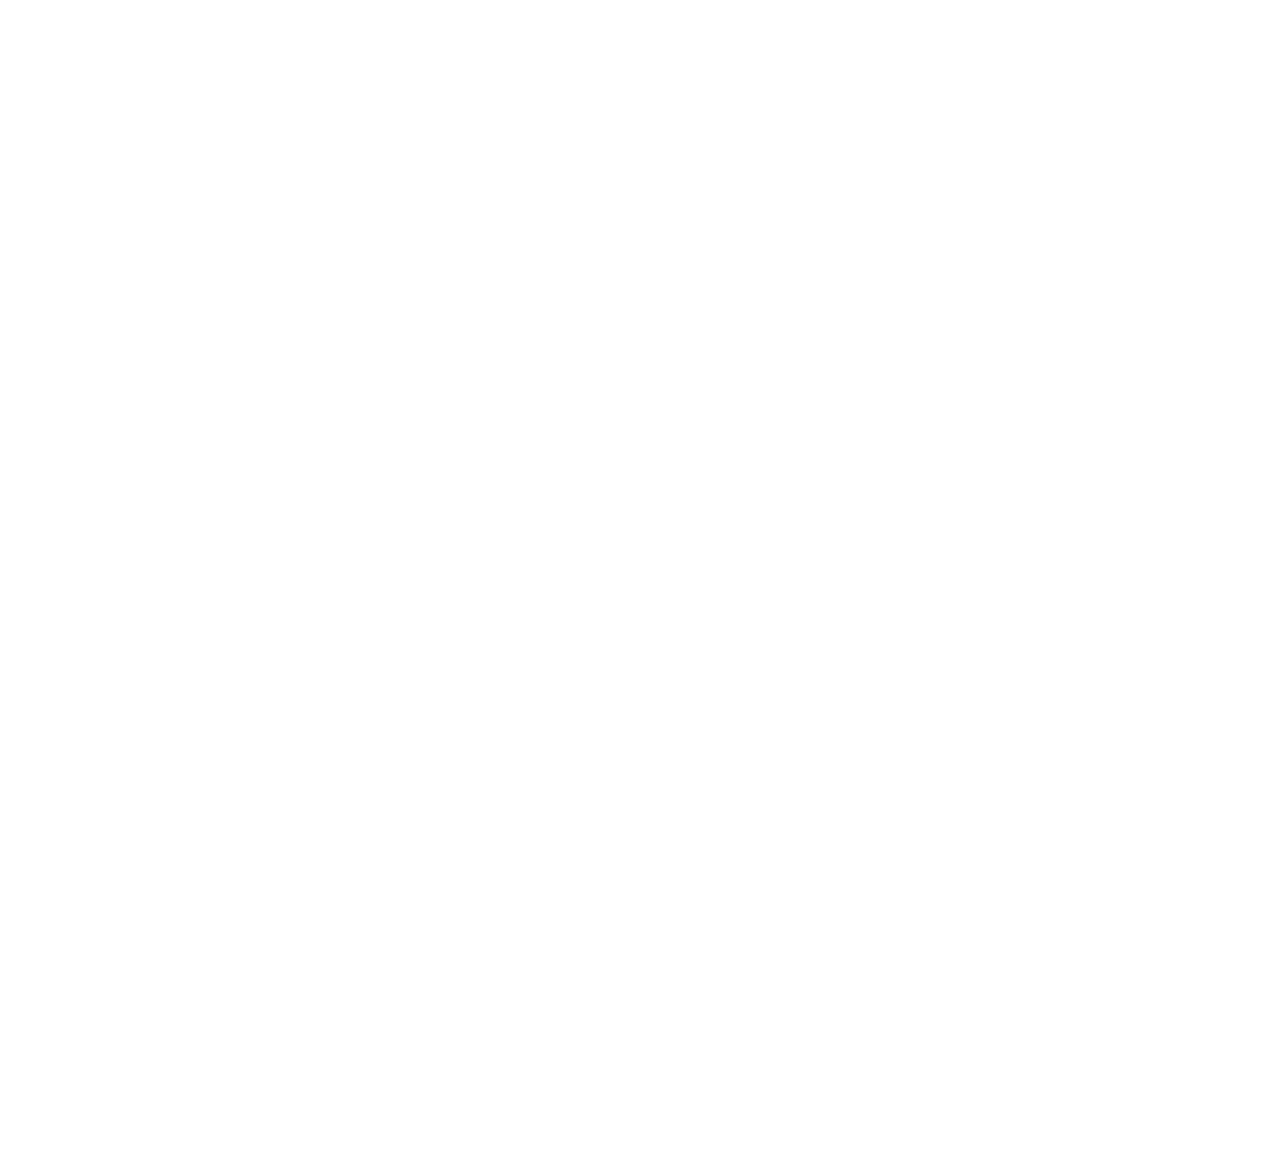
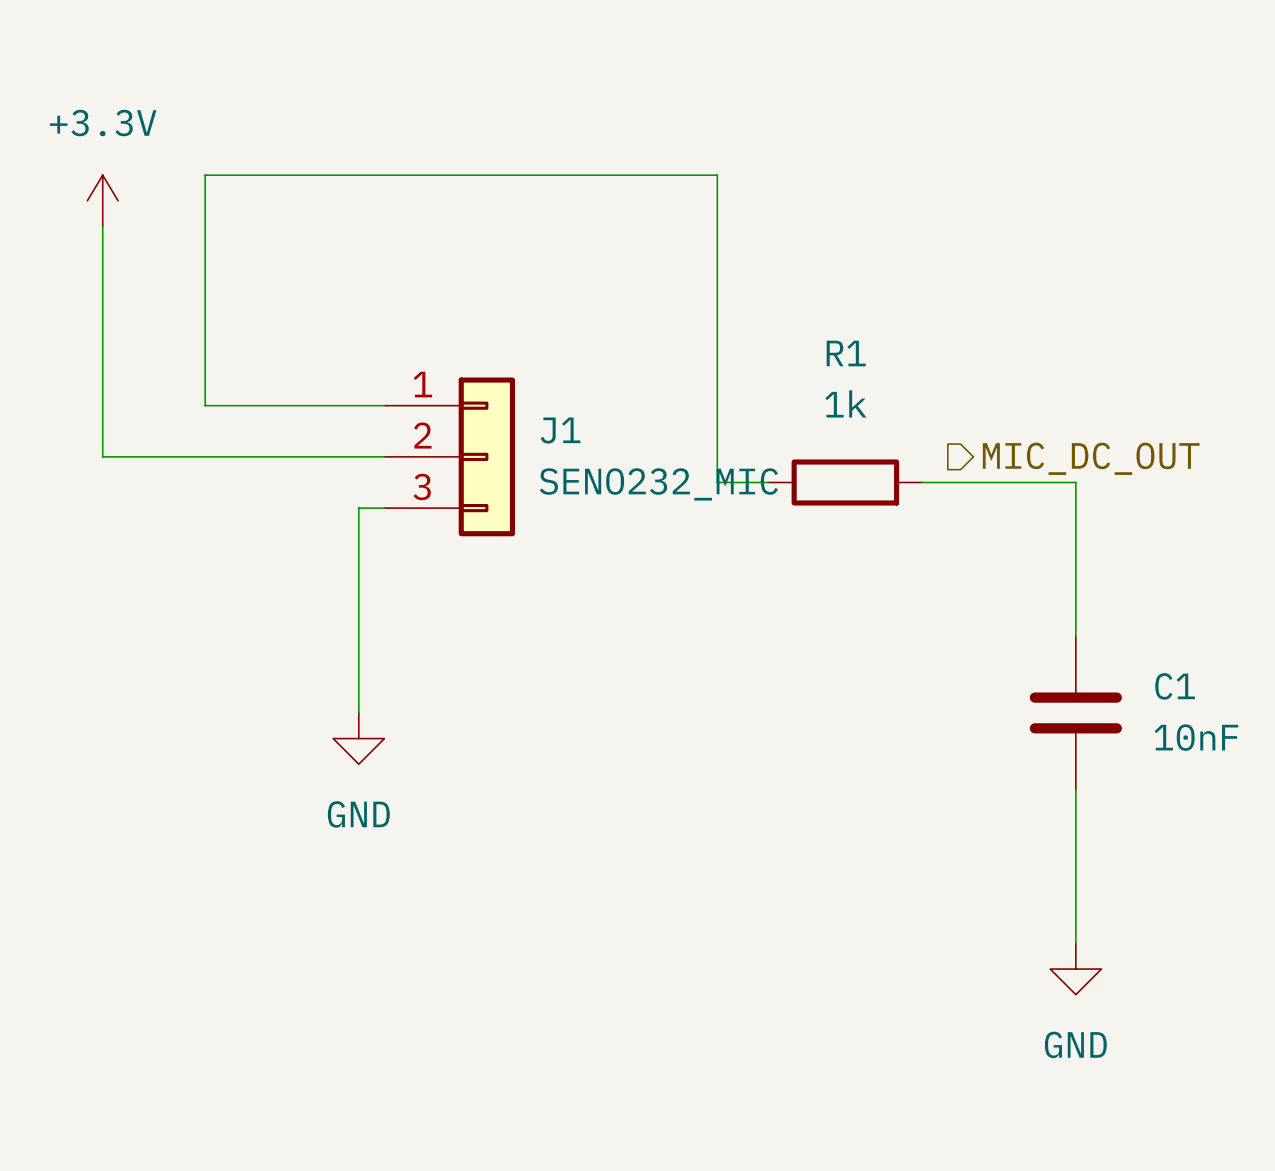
power symbol: none -> +3.3V (102, 200)
wire: none -> (102, 226) (102, 456) (384, 456)
wire: none -> (384, 405) (205, 405) (205, 175) (717, 175) (717, 482) (768, 482)
J1: none -> SENO232_MIC (449, 456)
hierarchical label: none -> MIC_DC_OUT (1091, 458)
R1: none -> 1k (845, 482)
wire: none -> (922, 482) (1075, 482) (1075, 636)
wire: none -> (384, 508) (358, 508) (358, 712)
C1: none -> 10nF (1075, 712)
power symbol: none -> GND (358, 738)
wire: none -> (1075, 789) (1075, 943)
power symbol: none -> GND (1075, 969)

